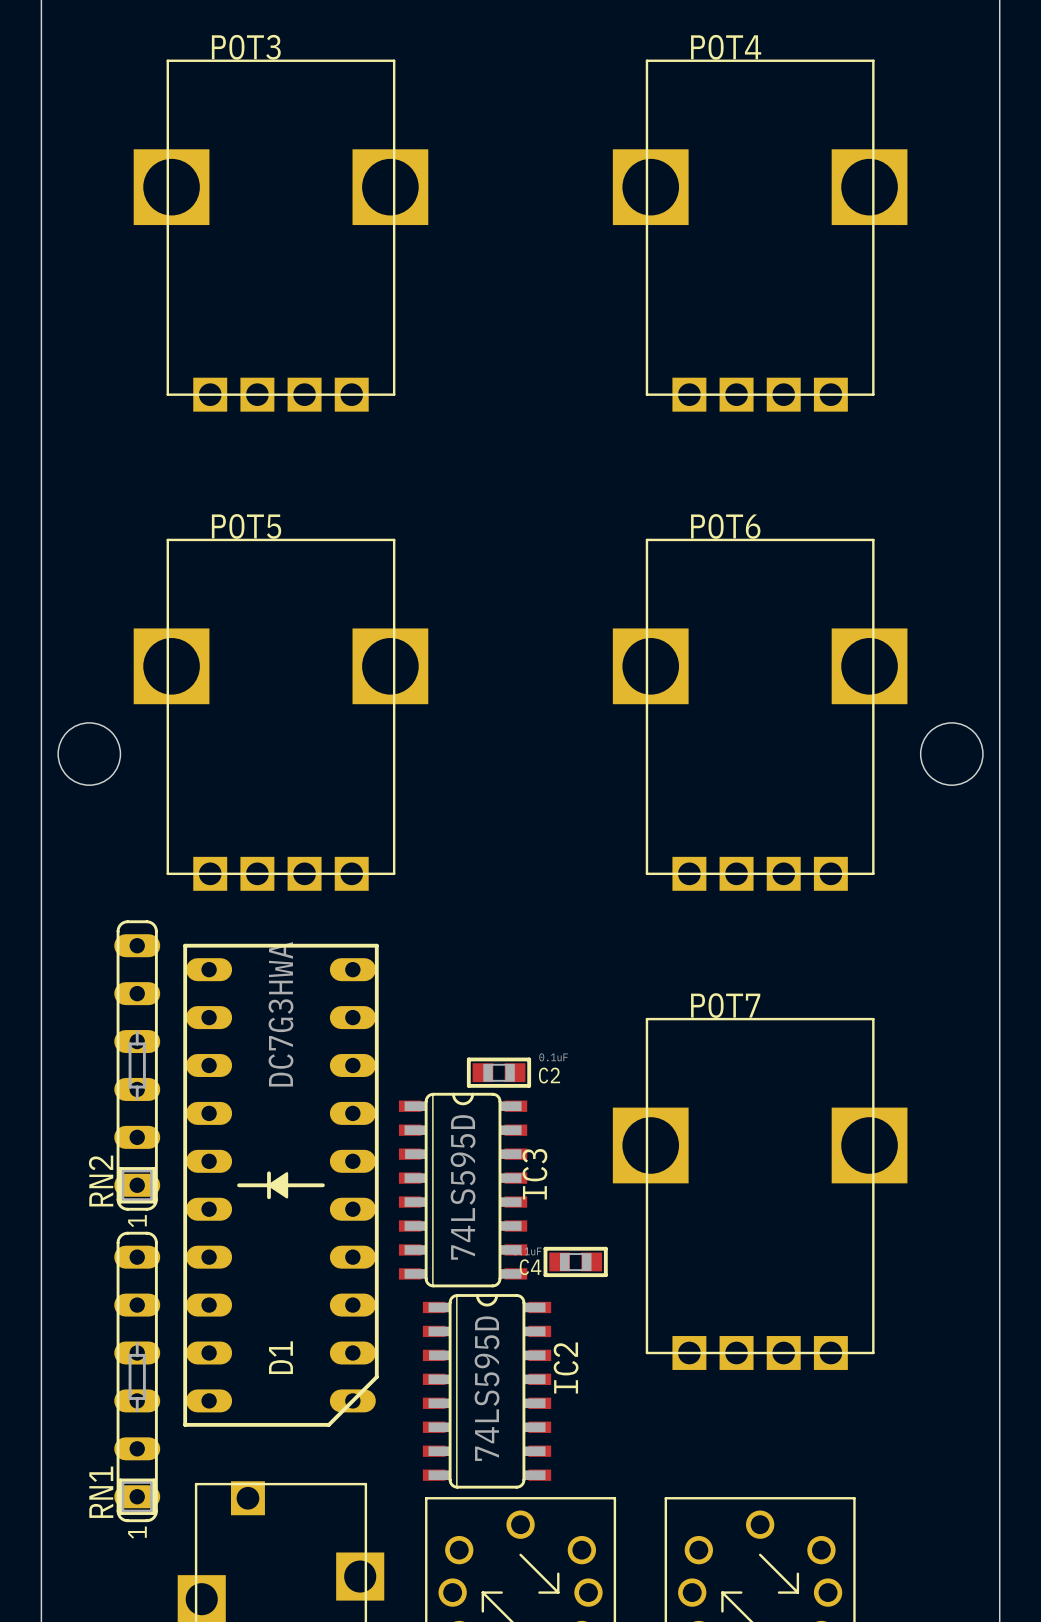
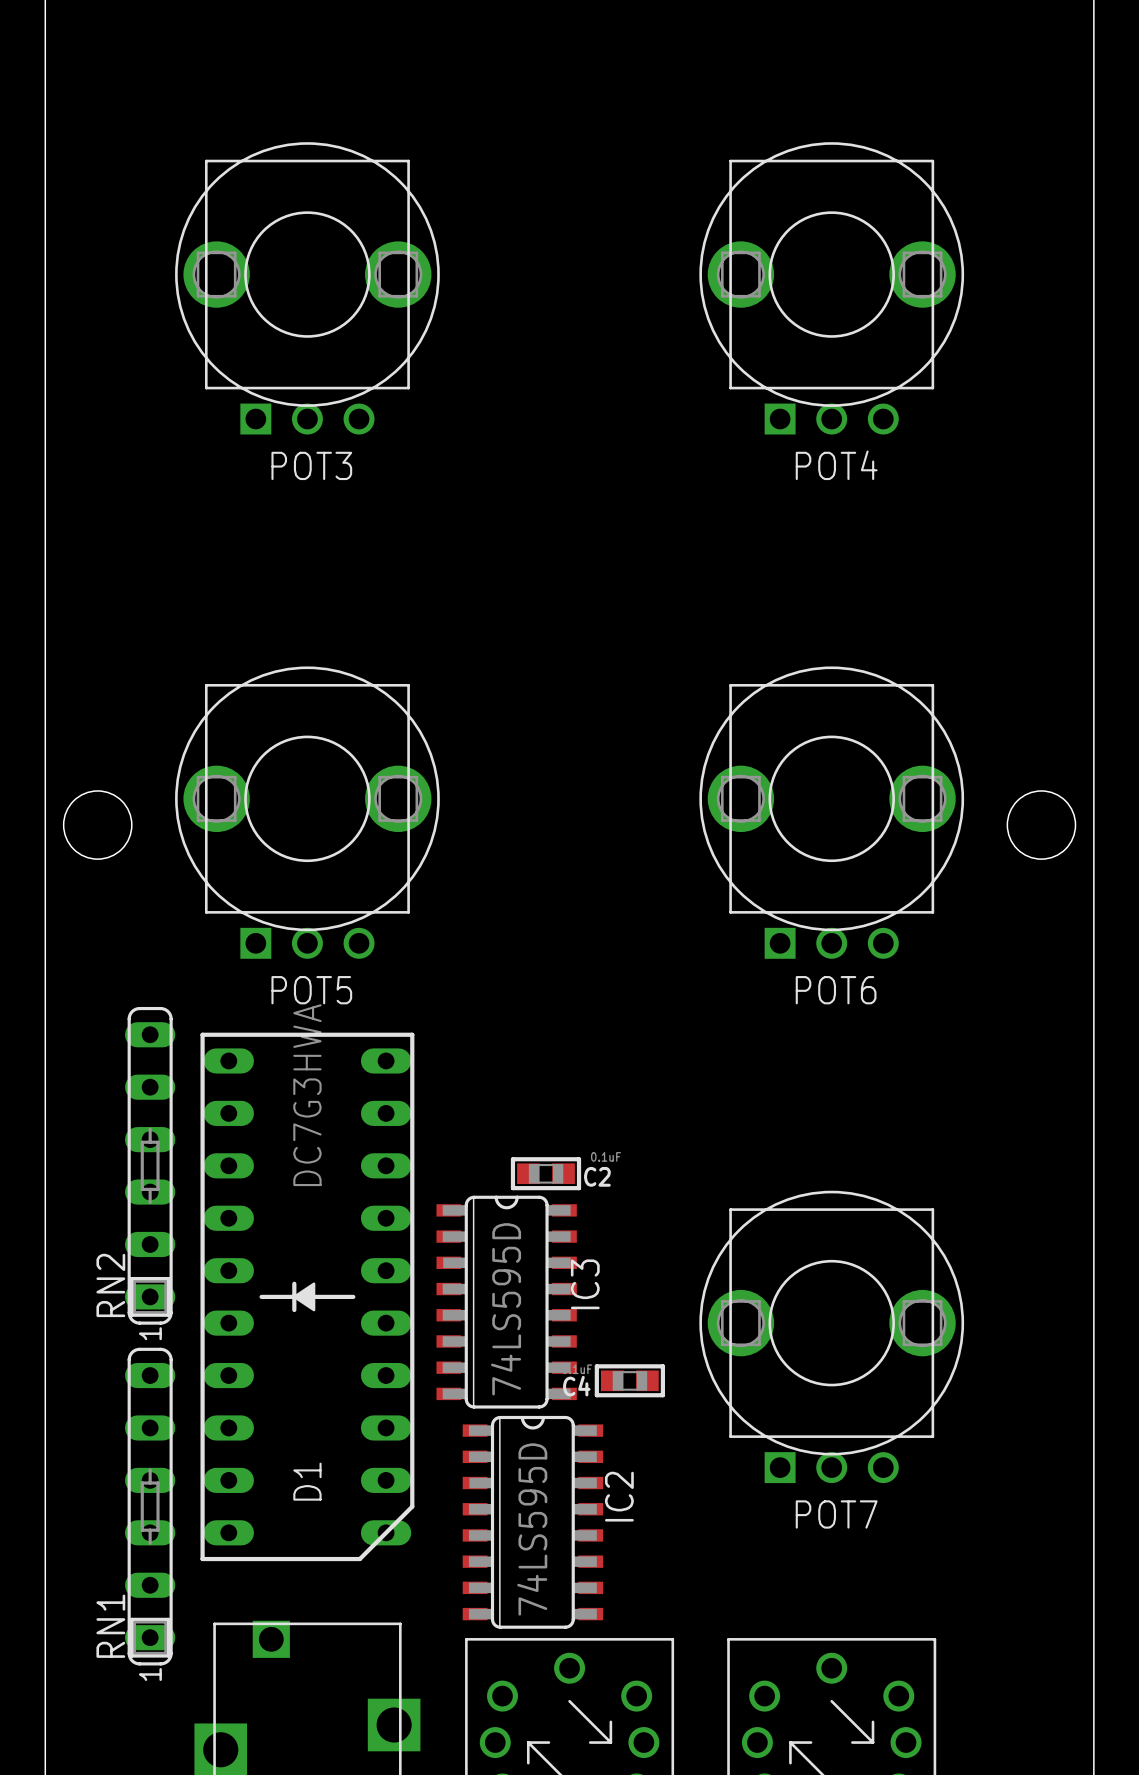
POT3 name position: POT3 (246, 47) -> POT3 (311, 465)
POT4 name position: POT4 (726, 47) -> POT4 (836, 465)
POT3 footprint: [133, 59, 429, 412] -> [175, 142, 440, 435]
POT4 footprint: [612, 59, 908, 412] -> [699, 142, 965, 435]
POT5 name position: POT5 (246, 526) -> POT5 (311, 990)
POT6 name position: POT6 (725, 526) -> POT6 (836, 990)
POT5 footprint: [133, 538, 429, 891] -> [175, 666, 440, 959]
POT6 footprint: [612, 538, 908, 891] -> [699, 666, 965, 959]
POT7 name position: POT7 (725, 1005) -> POT7 (836, 1514)
POT7 footprint: [612, 1017, 908, 1370] -> [699, 1190, 965, 1484]

